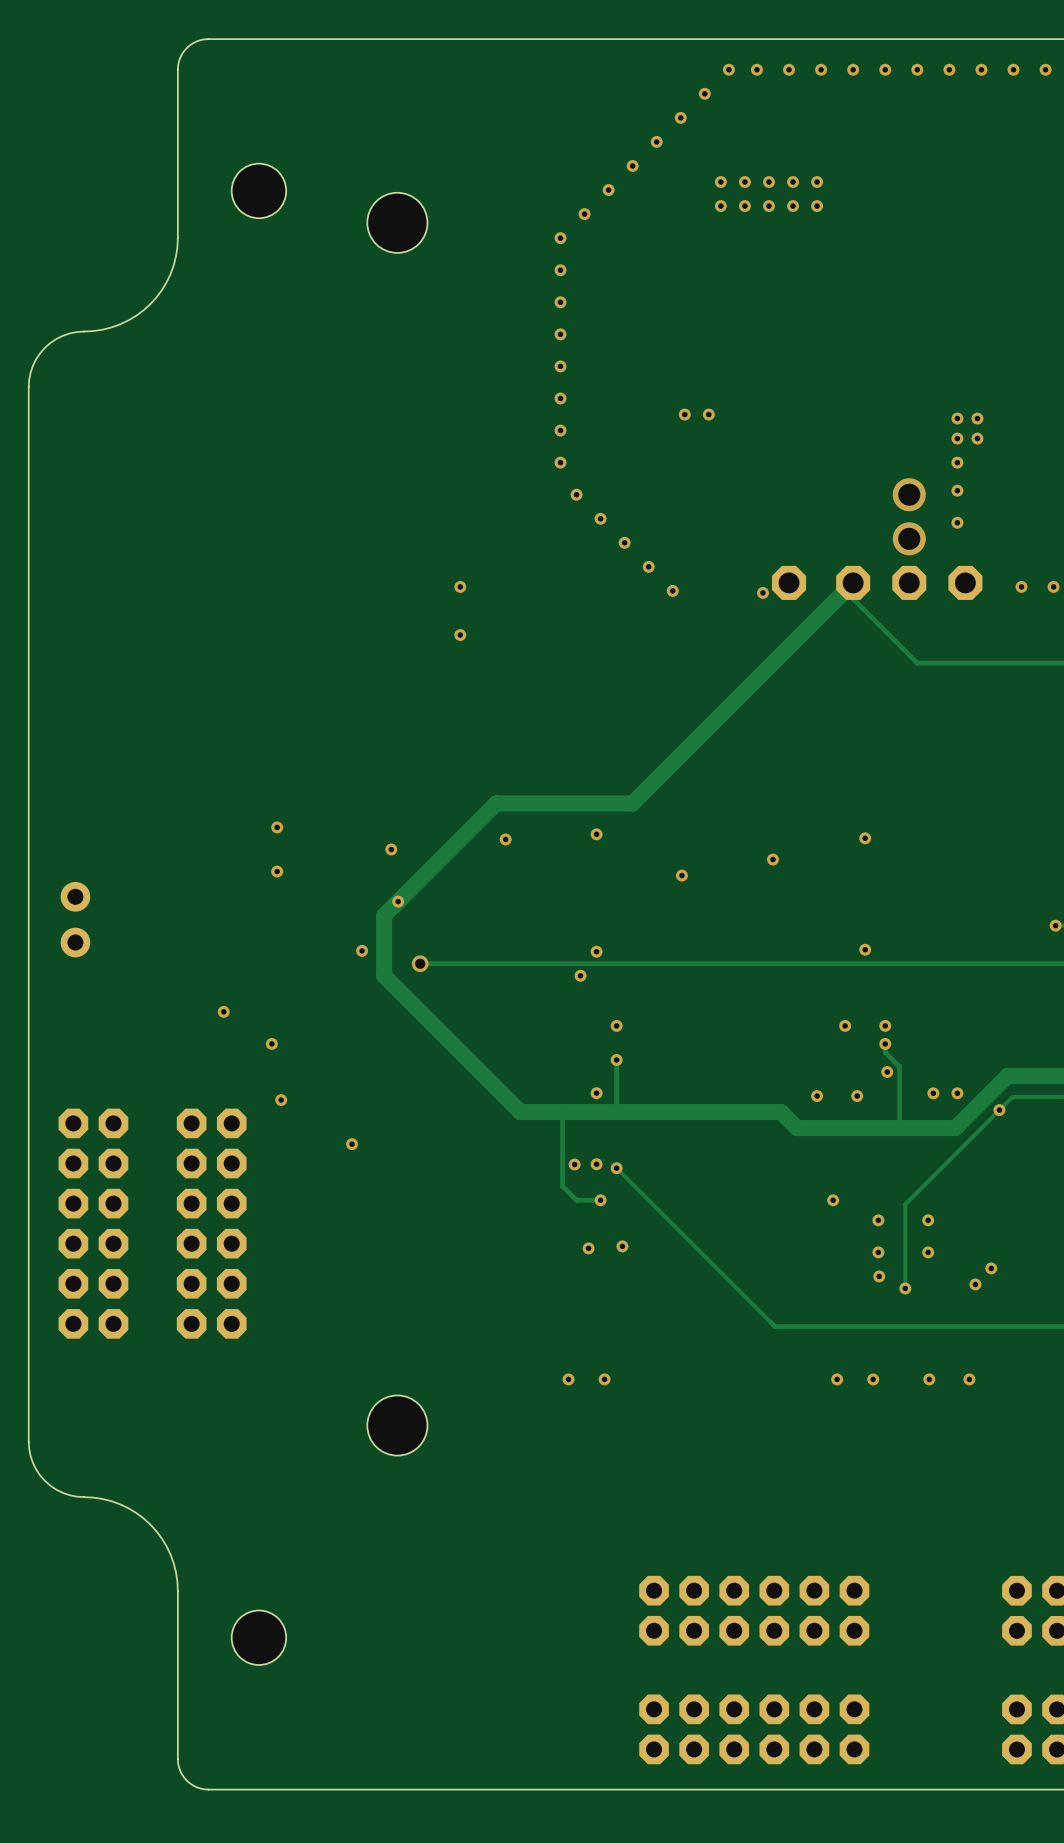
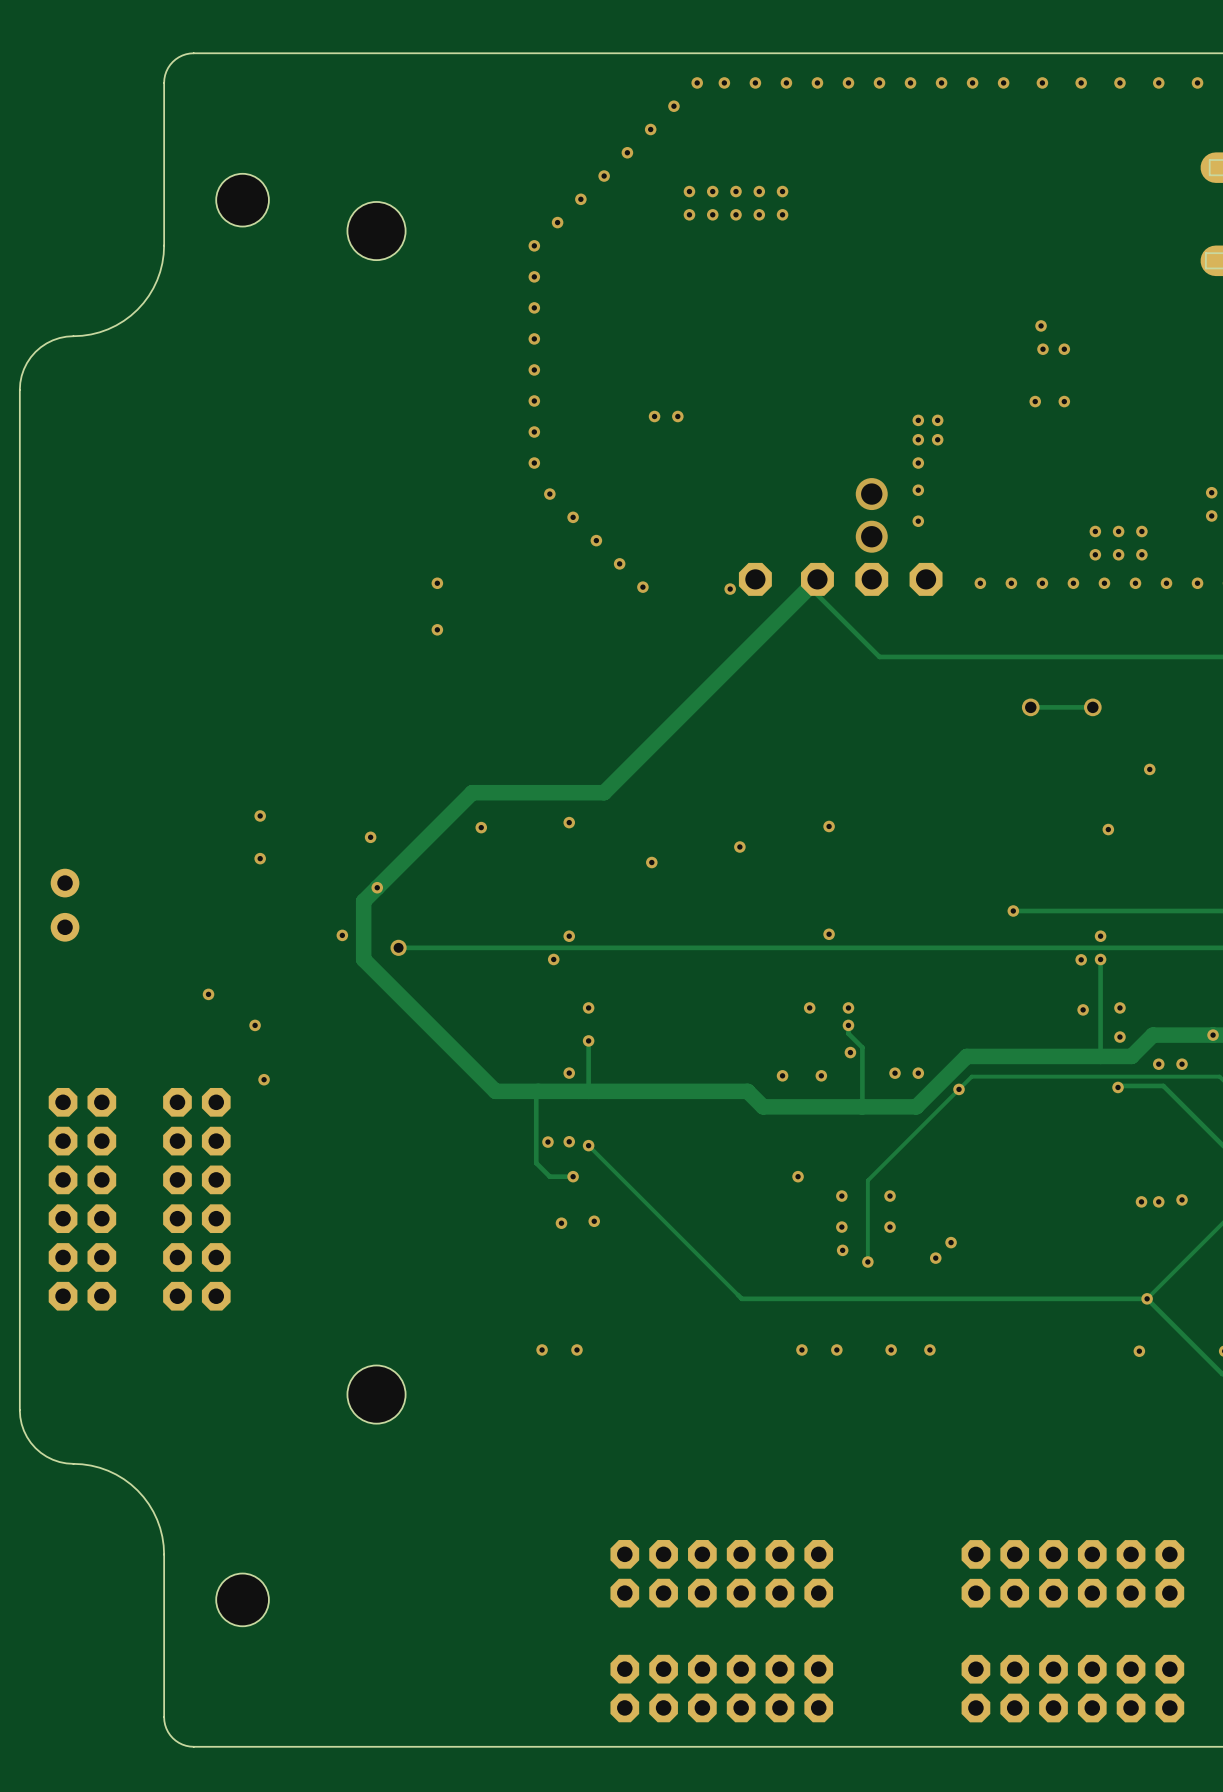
via: (352, 1144) -> none

